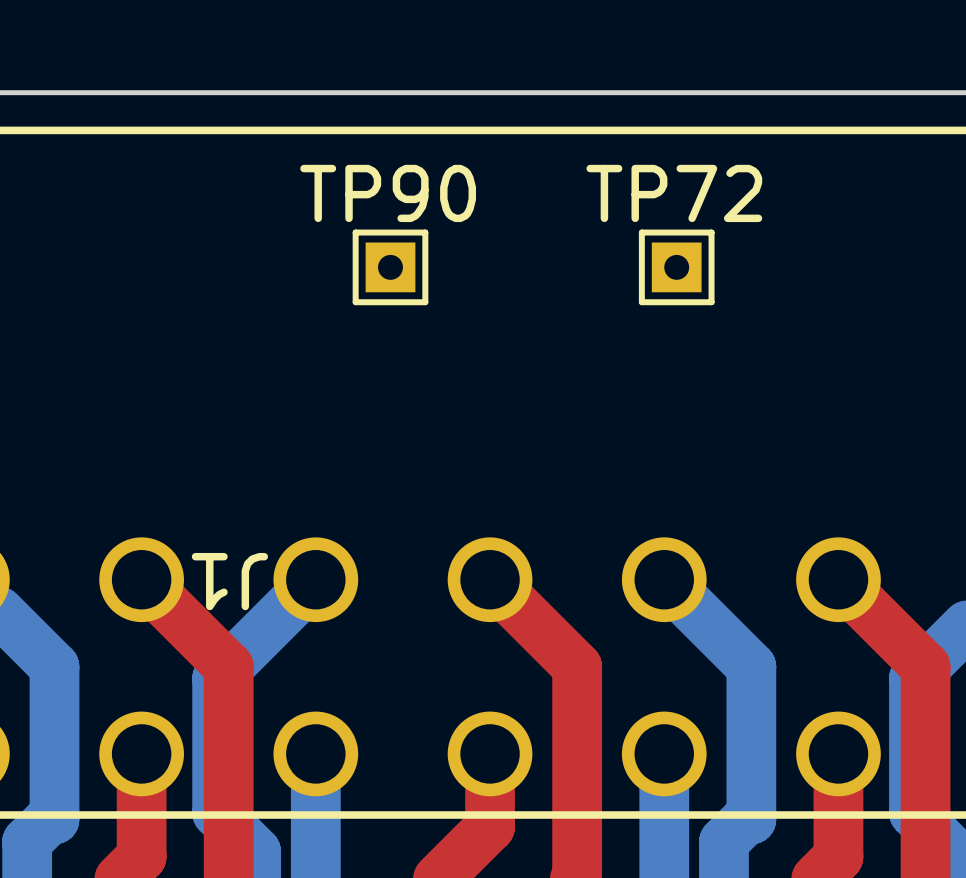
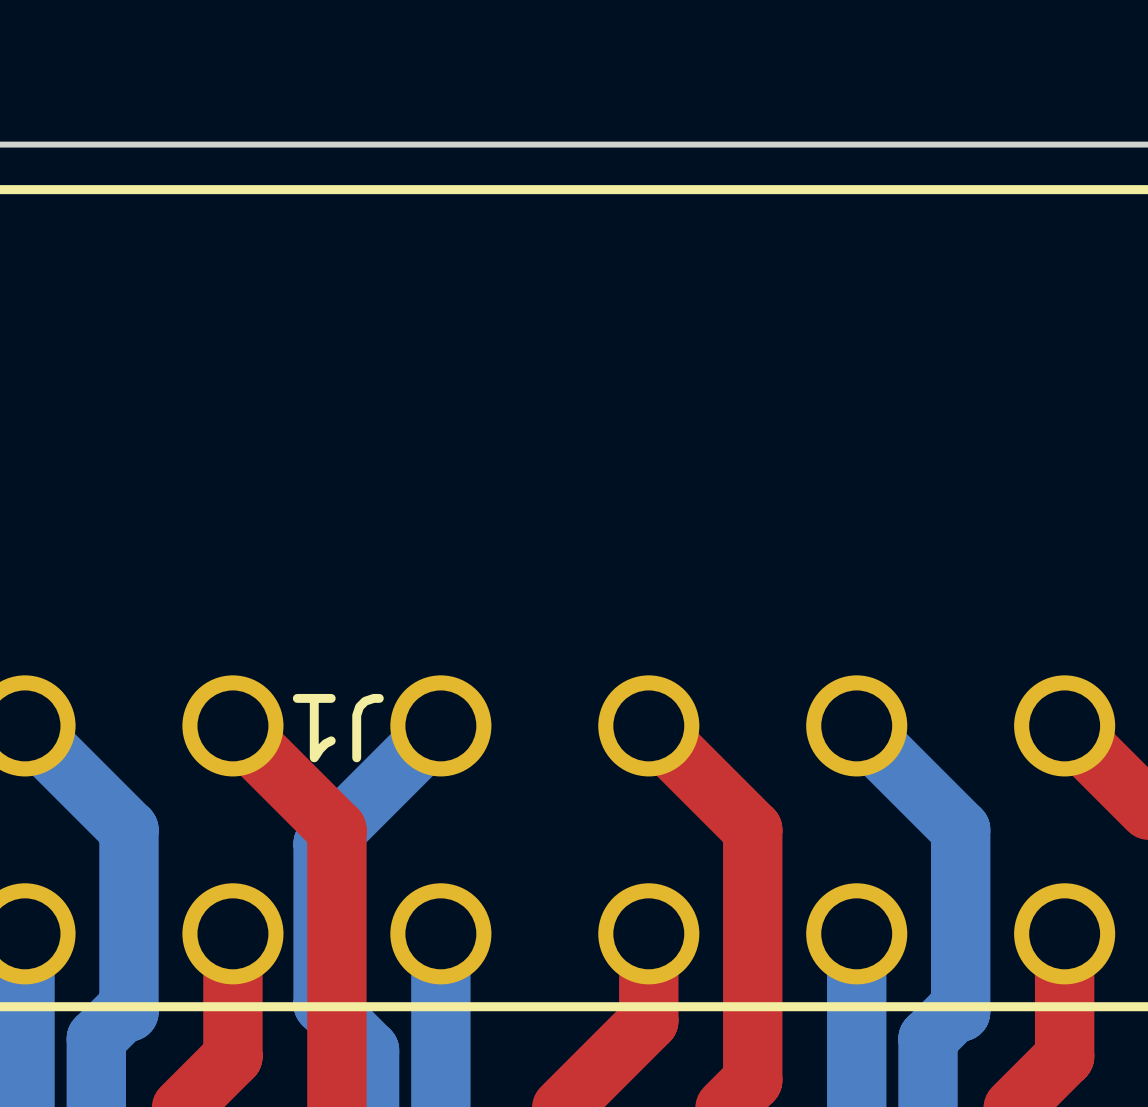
TP90: (390, 267) -> none
TP72: (676, 267) -> none

